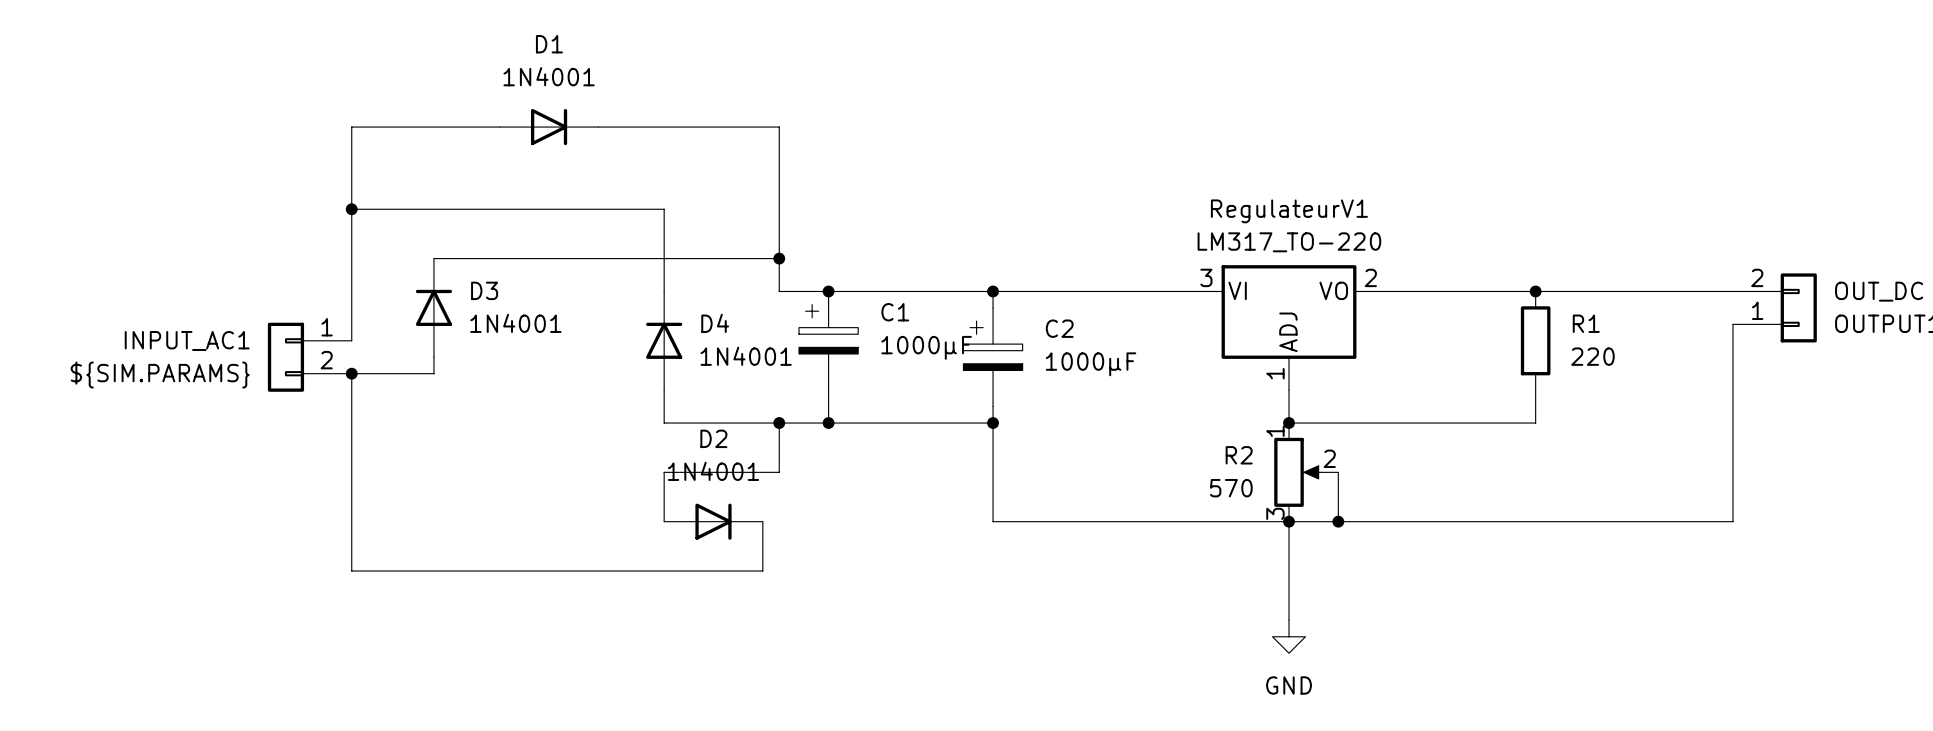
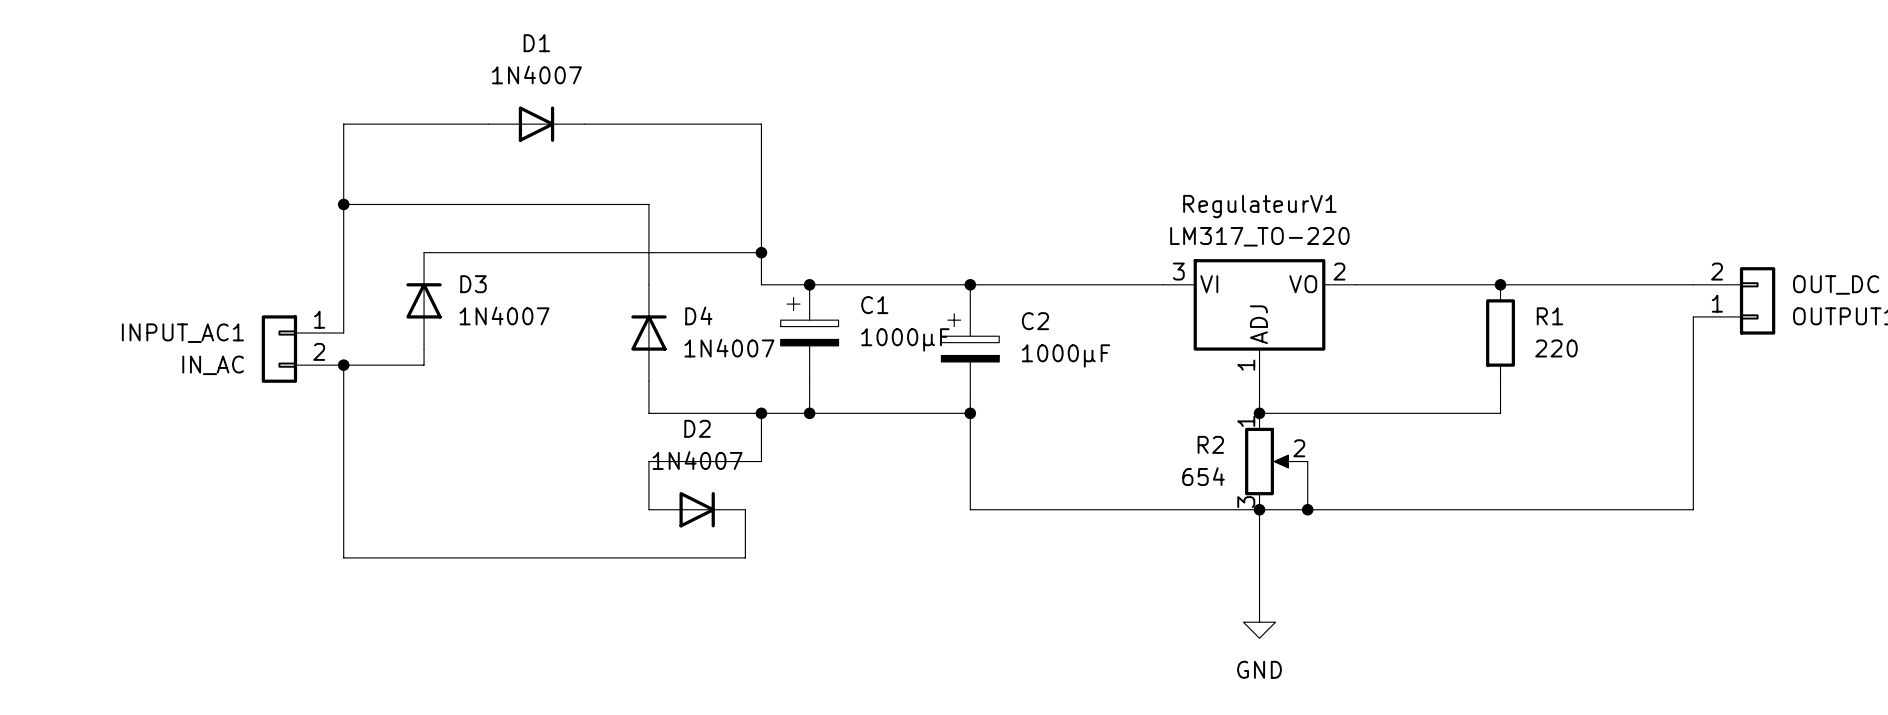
D1 value: 1N4001 (549, 76) -> 1N4007 (536, 74)
D3 value: 1N4001 (515, 323) -> 1N4007 (504, 315)
D4 value: 1N4001 (746, 356) -> 1N4007 (729, 348)
INPUT_AC1 value: ${SIM.PARAMS} (160, 375) -> IN_AC (213, 365)
D2 value: 1N4001 (713, 471) -> 1N4007 (697, 460)
R2 value: 570 (1231, 488) -> 654 (1203, 476)

